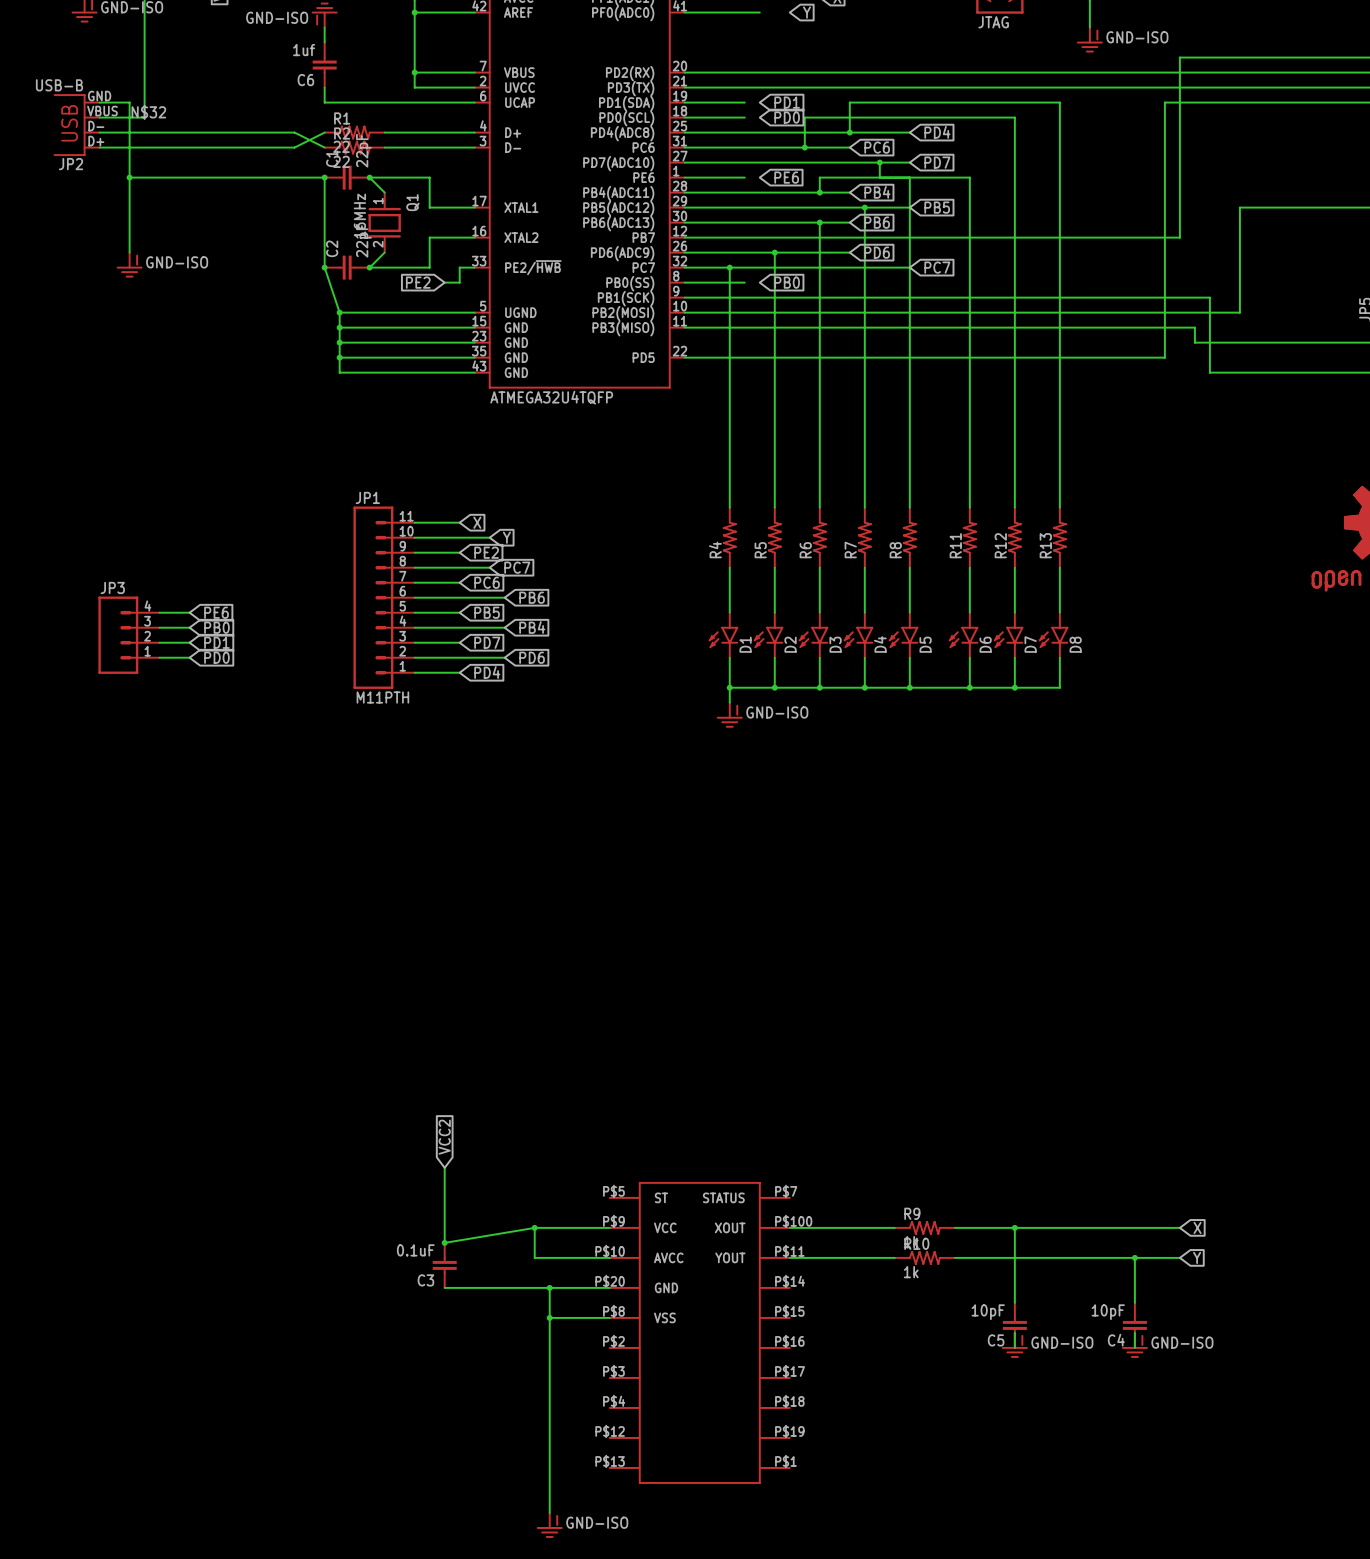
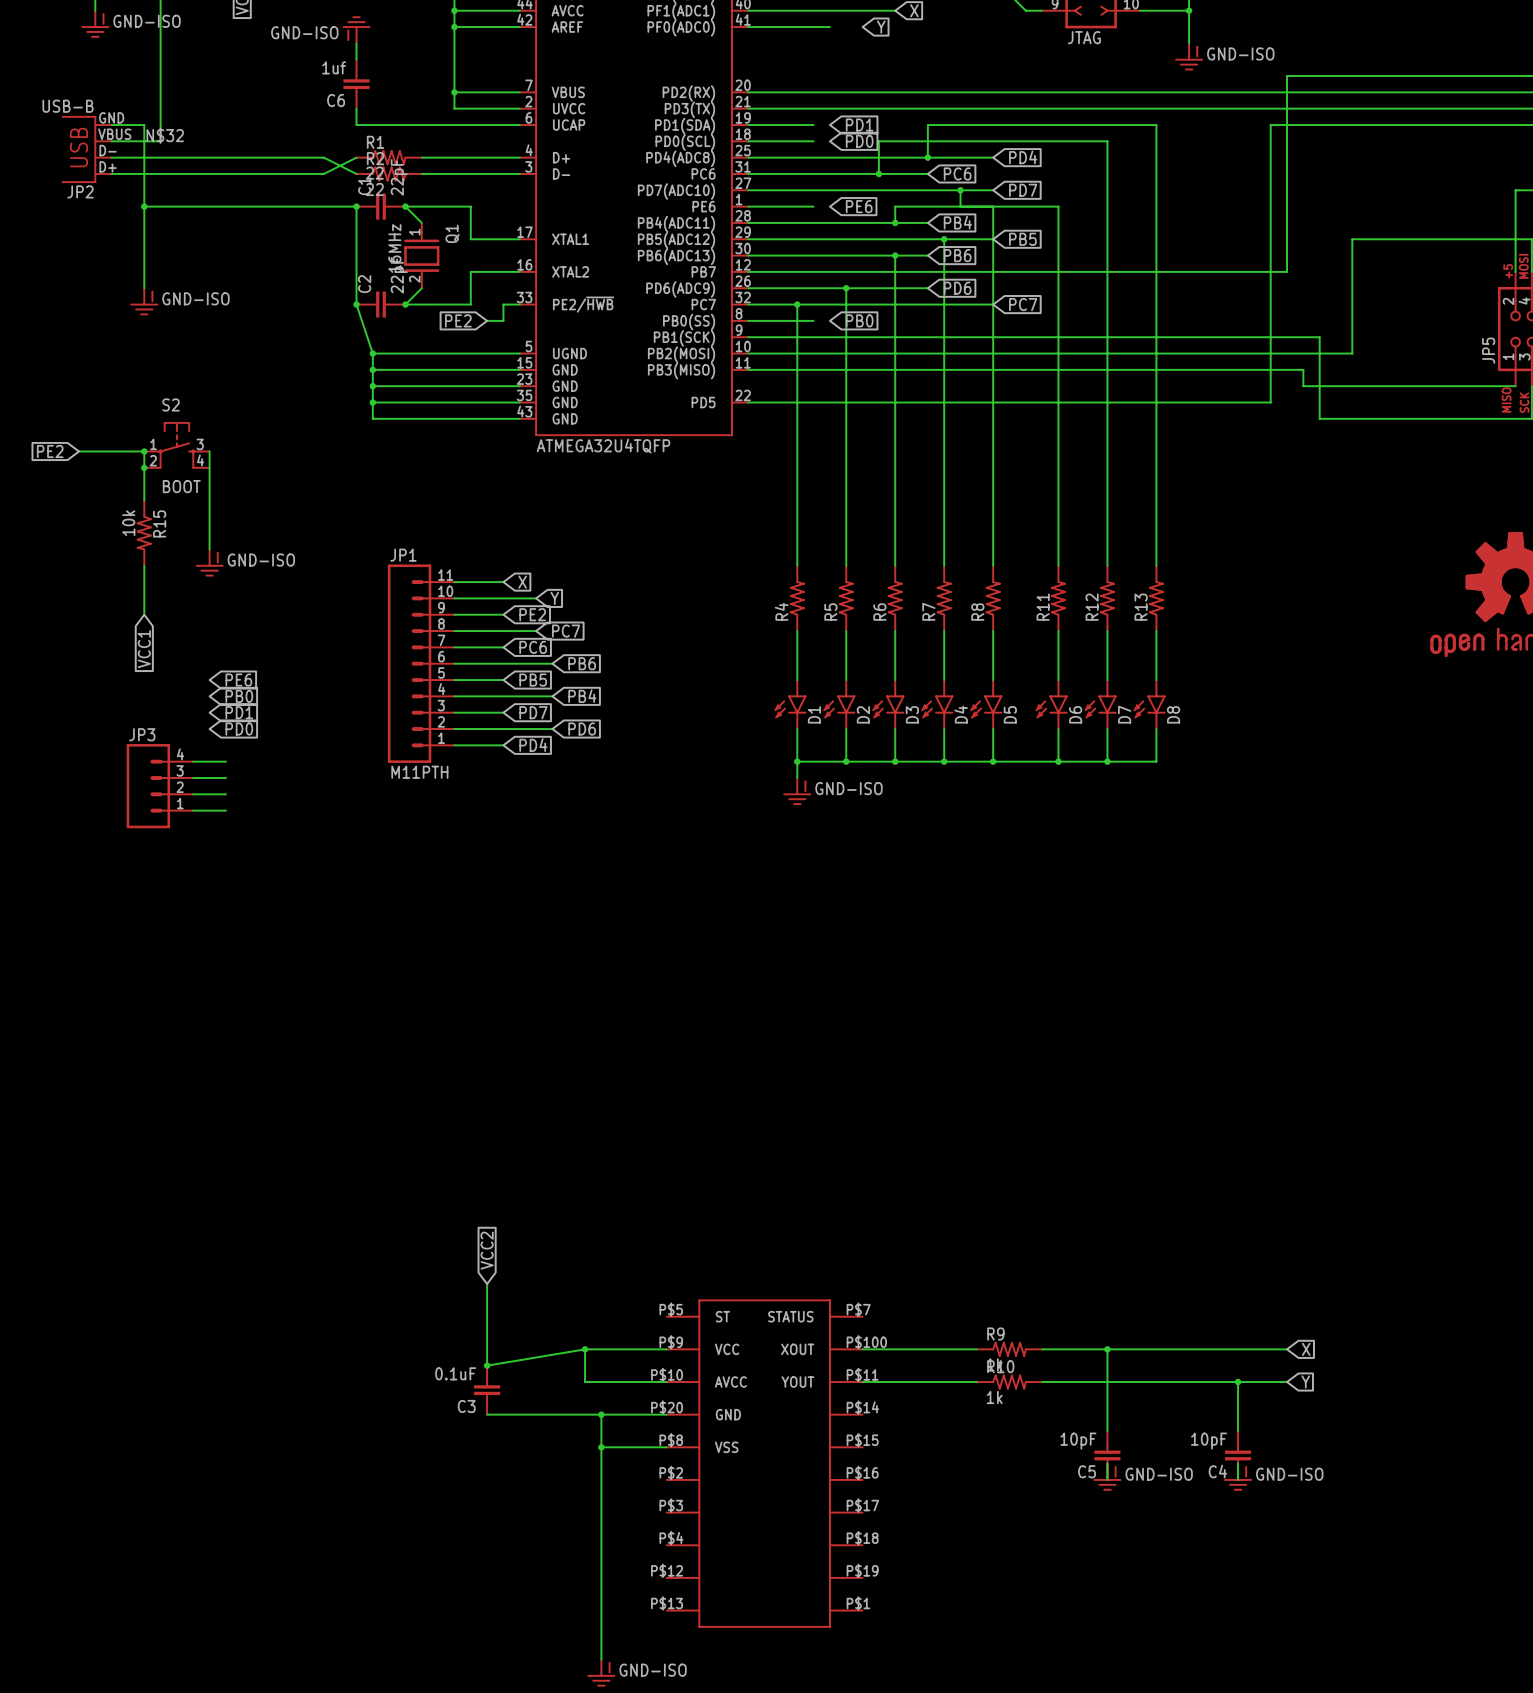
S2: none -> BOOT (176, 445)
global label: none -> PE2 (50, 451)
wire: none -> (78, 451) (144, 451) (144, 500)
junction: none -> (144, 451)
wire: none -> (209, 451) (209, 549)
junction: none -> (144, 467)
R15: none -> 10k (144, 533)
power symbol: none -> GND-ISO (209, 562)
wire: none -> (144, 565) (144, 614)
global label: none -> VCC1 (144, 649)
wire: (159, 612) (189, 612) -> (193, 761) (225, 761)
wire: (159, 627) (189, 627) -> (193, 777) (225, 777)
JP3 position: (129, 635) -> (159, 786)
wire: (159, 642) (189, 642) -> (193, 794) (225, 794)
wire: (159, 657) (189, 657) -> (193, 810) (225, 810)

